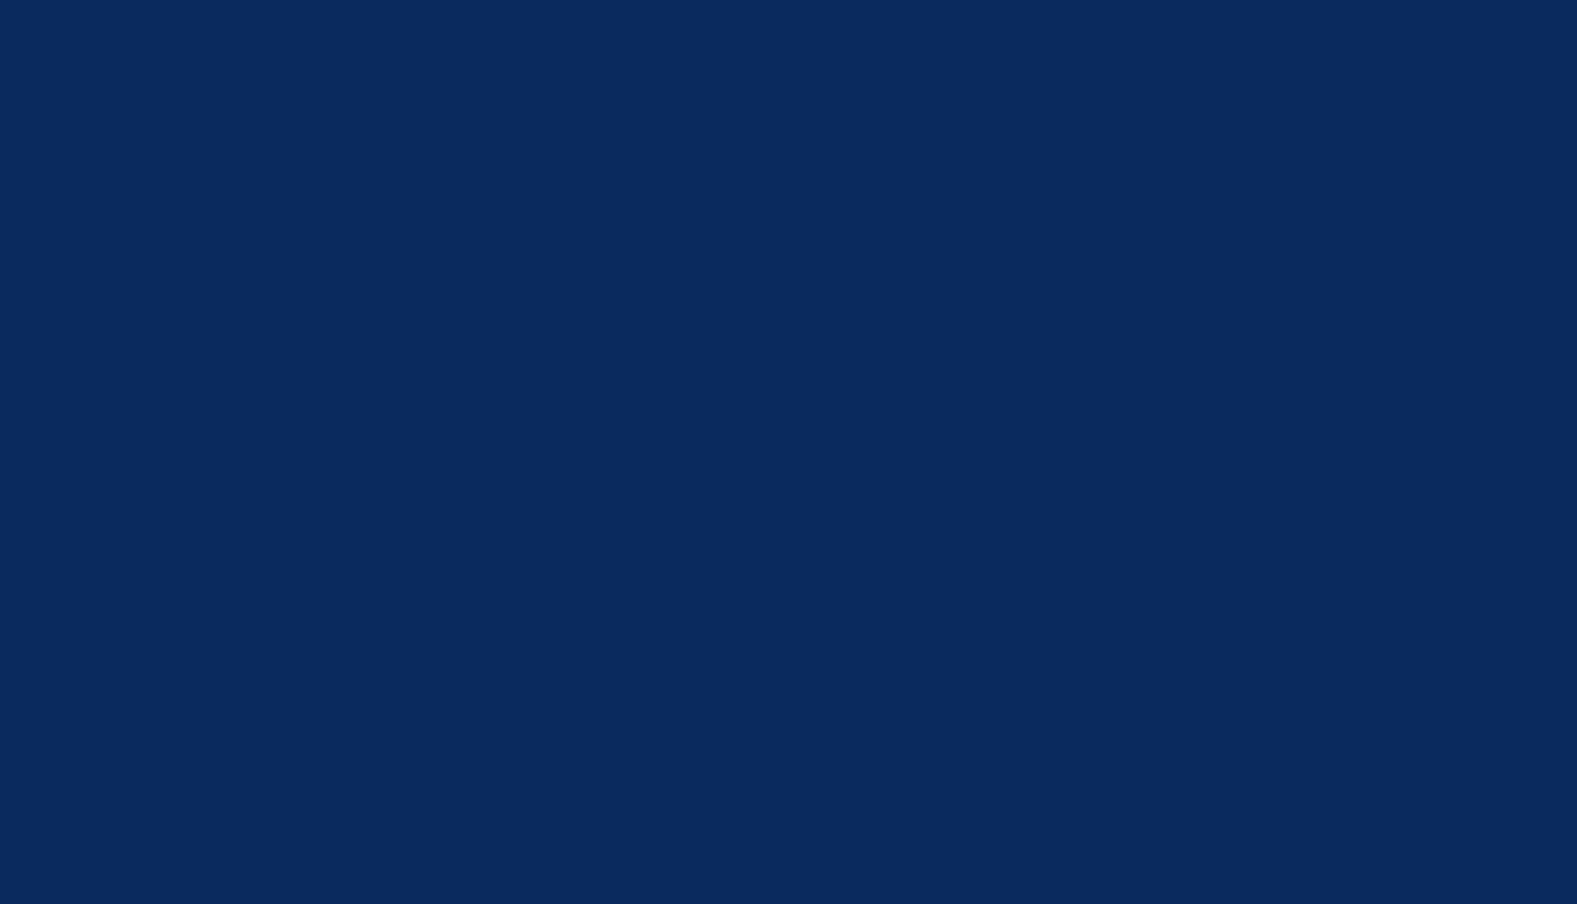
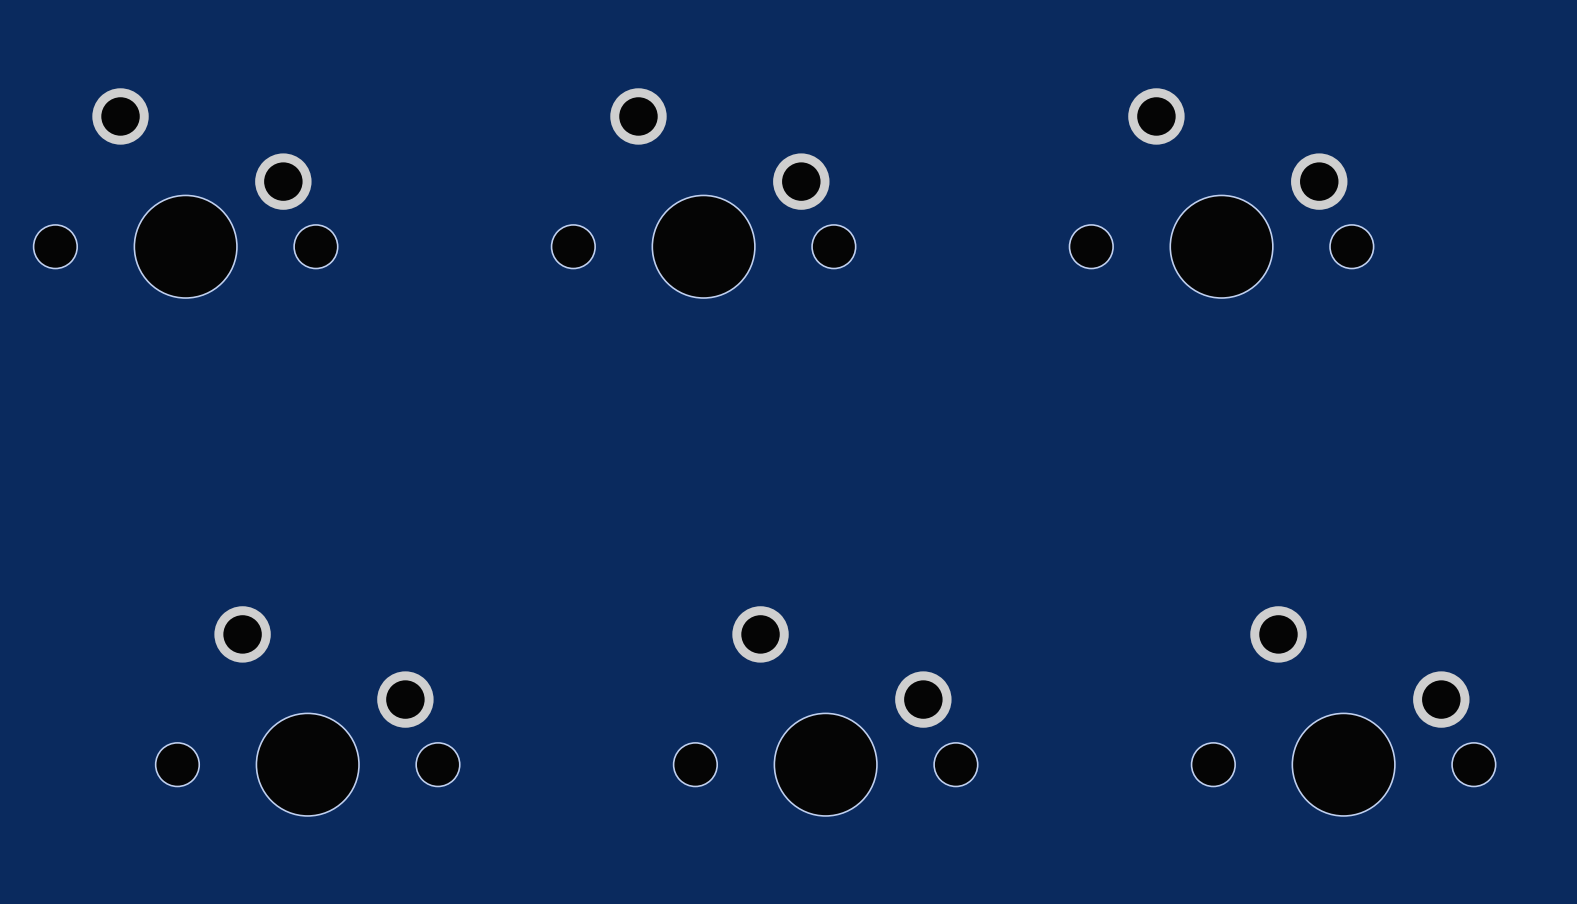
part: none -> (185, 193)
part: none -> (703, 193)
part: none -> (1221, 193)
part: none -> (307, 711)
part: none -> (825, 711)
part: none -> (1343, 711)

